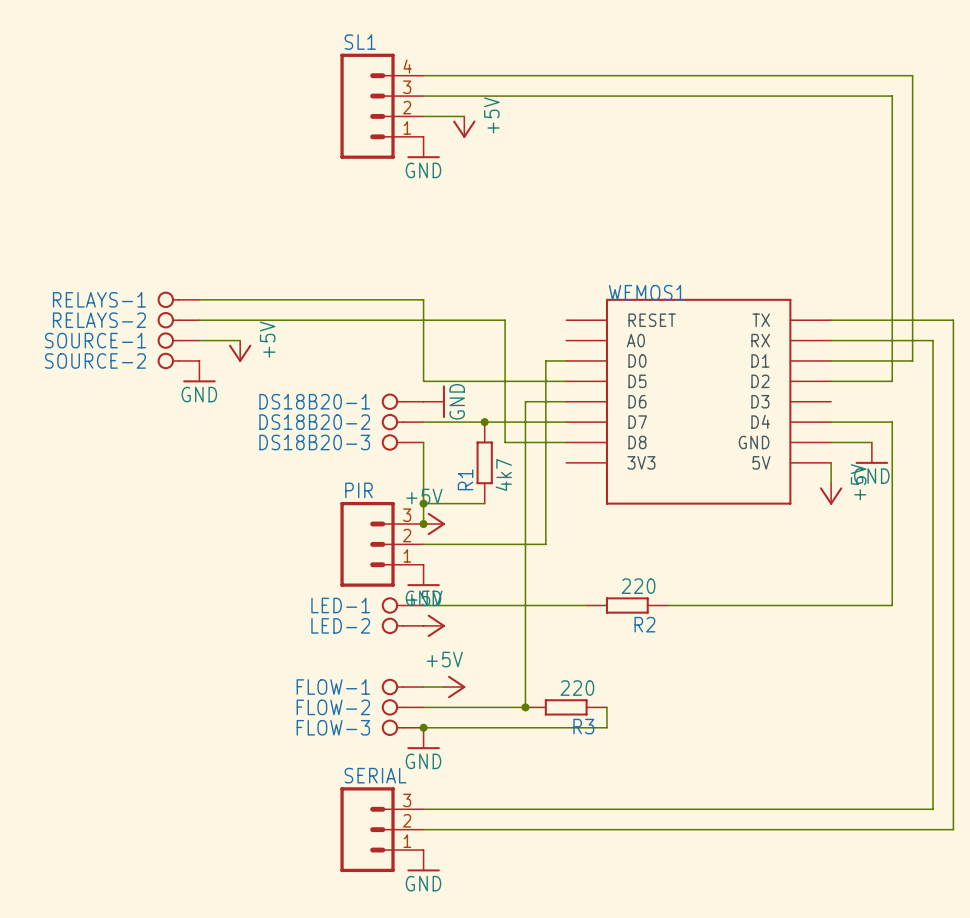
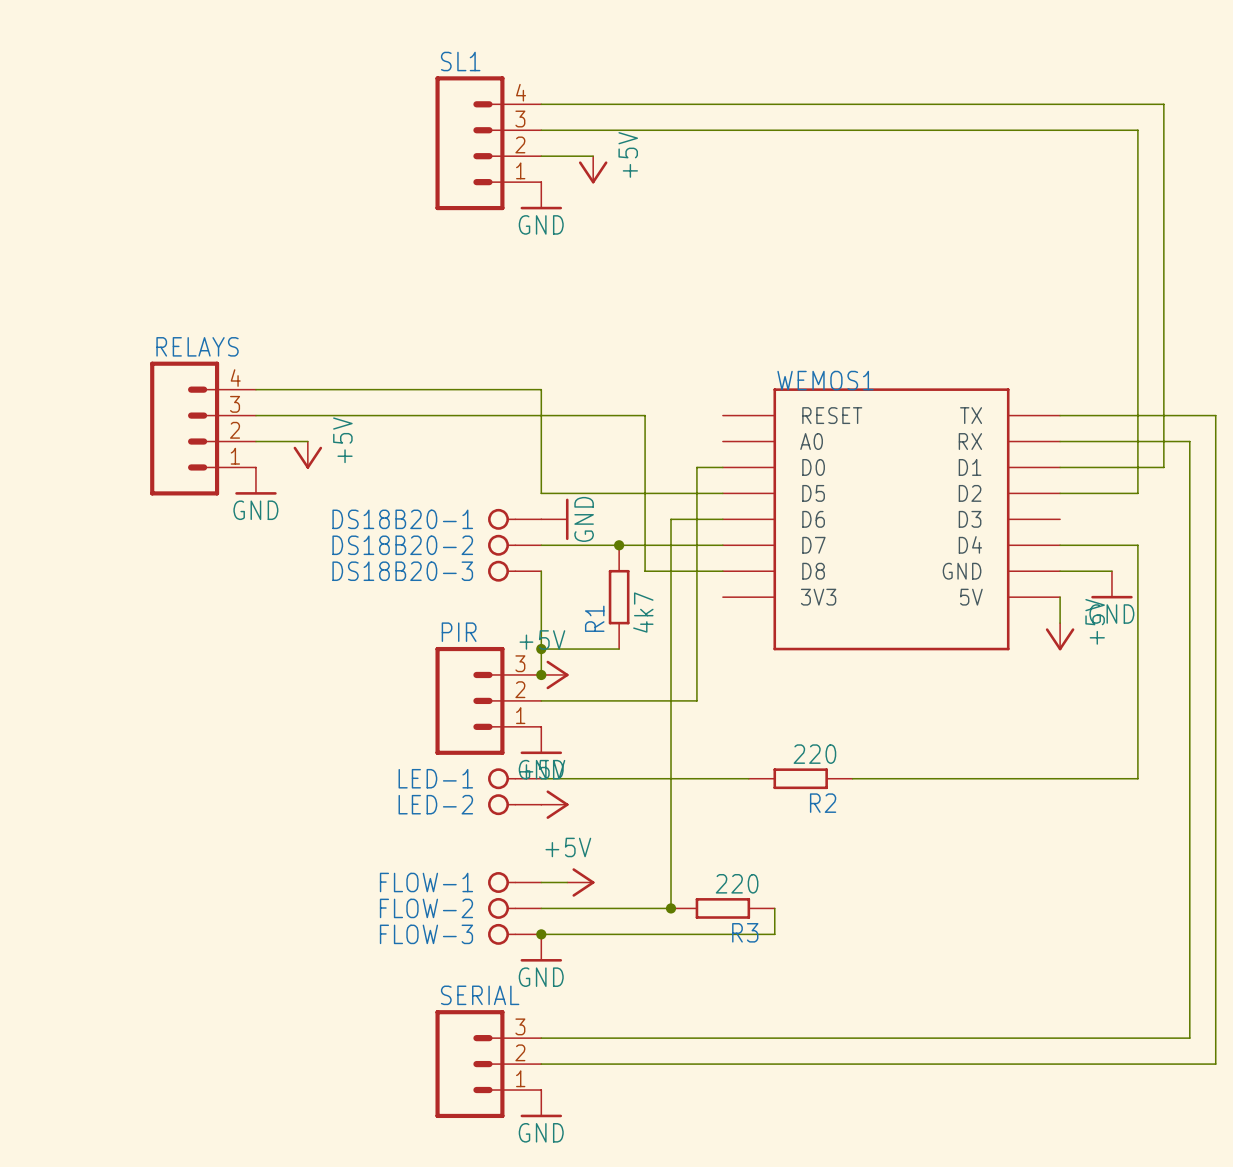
RELAYS-1: (178, 299) -> none
RELAYS-2: (178, 320) -> none
RELAYS: none -> (203, 428)
SOURCE-1: (178, 340) -> none
SOURCE-2: (178, 360) -> none

